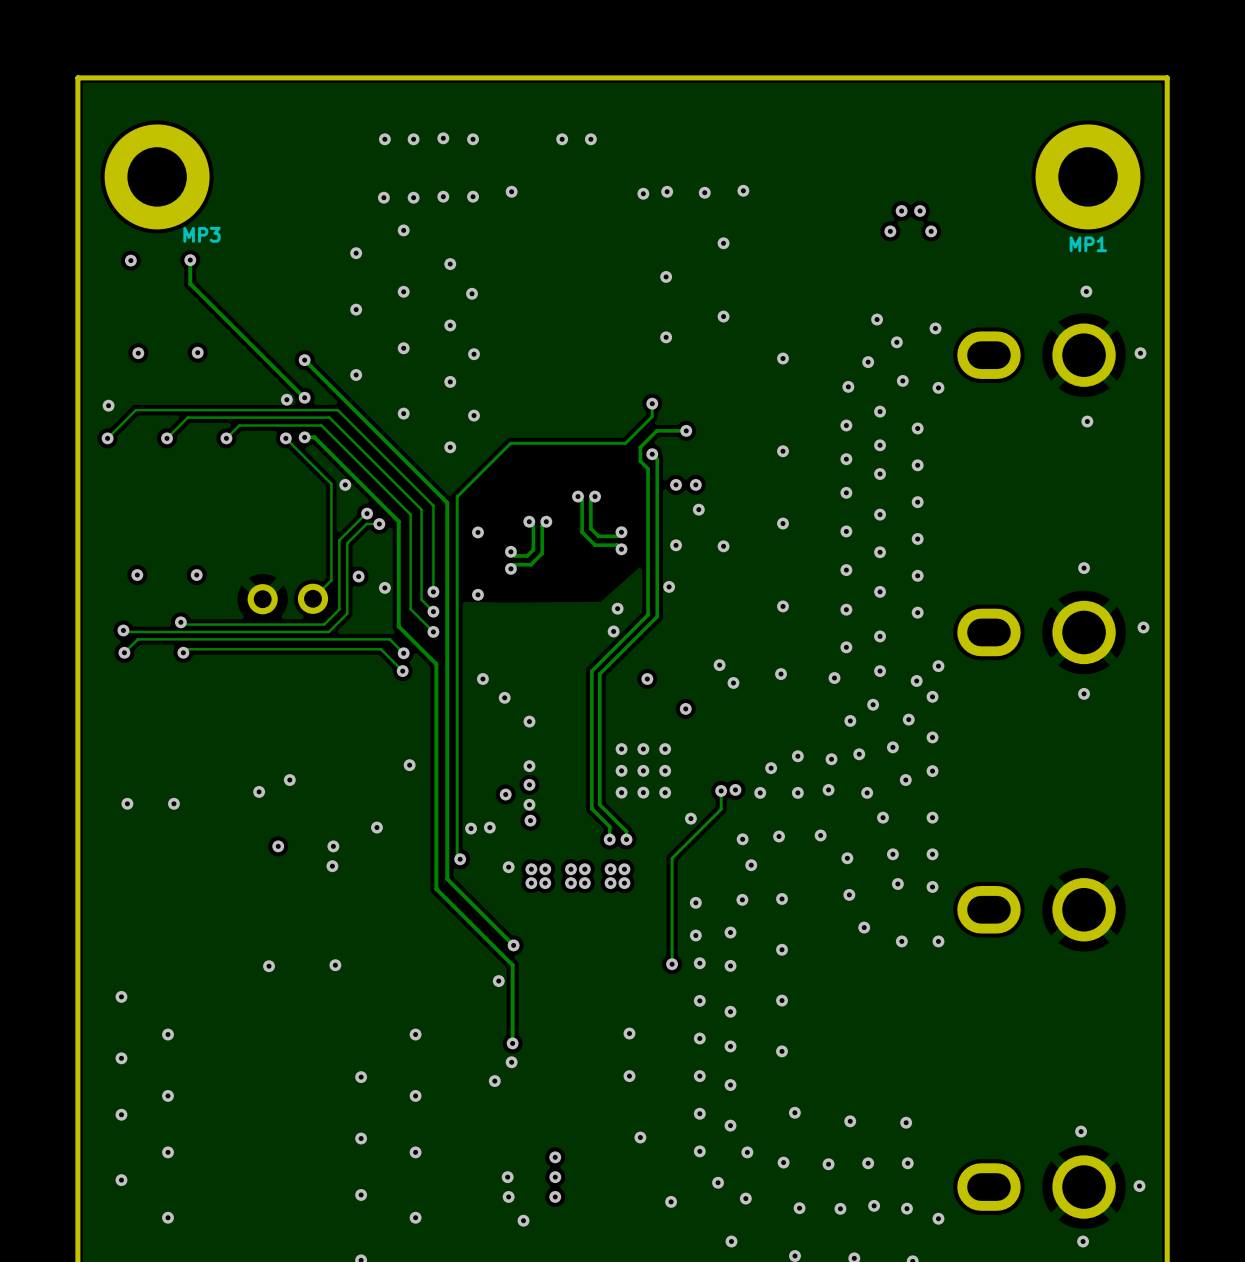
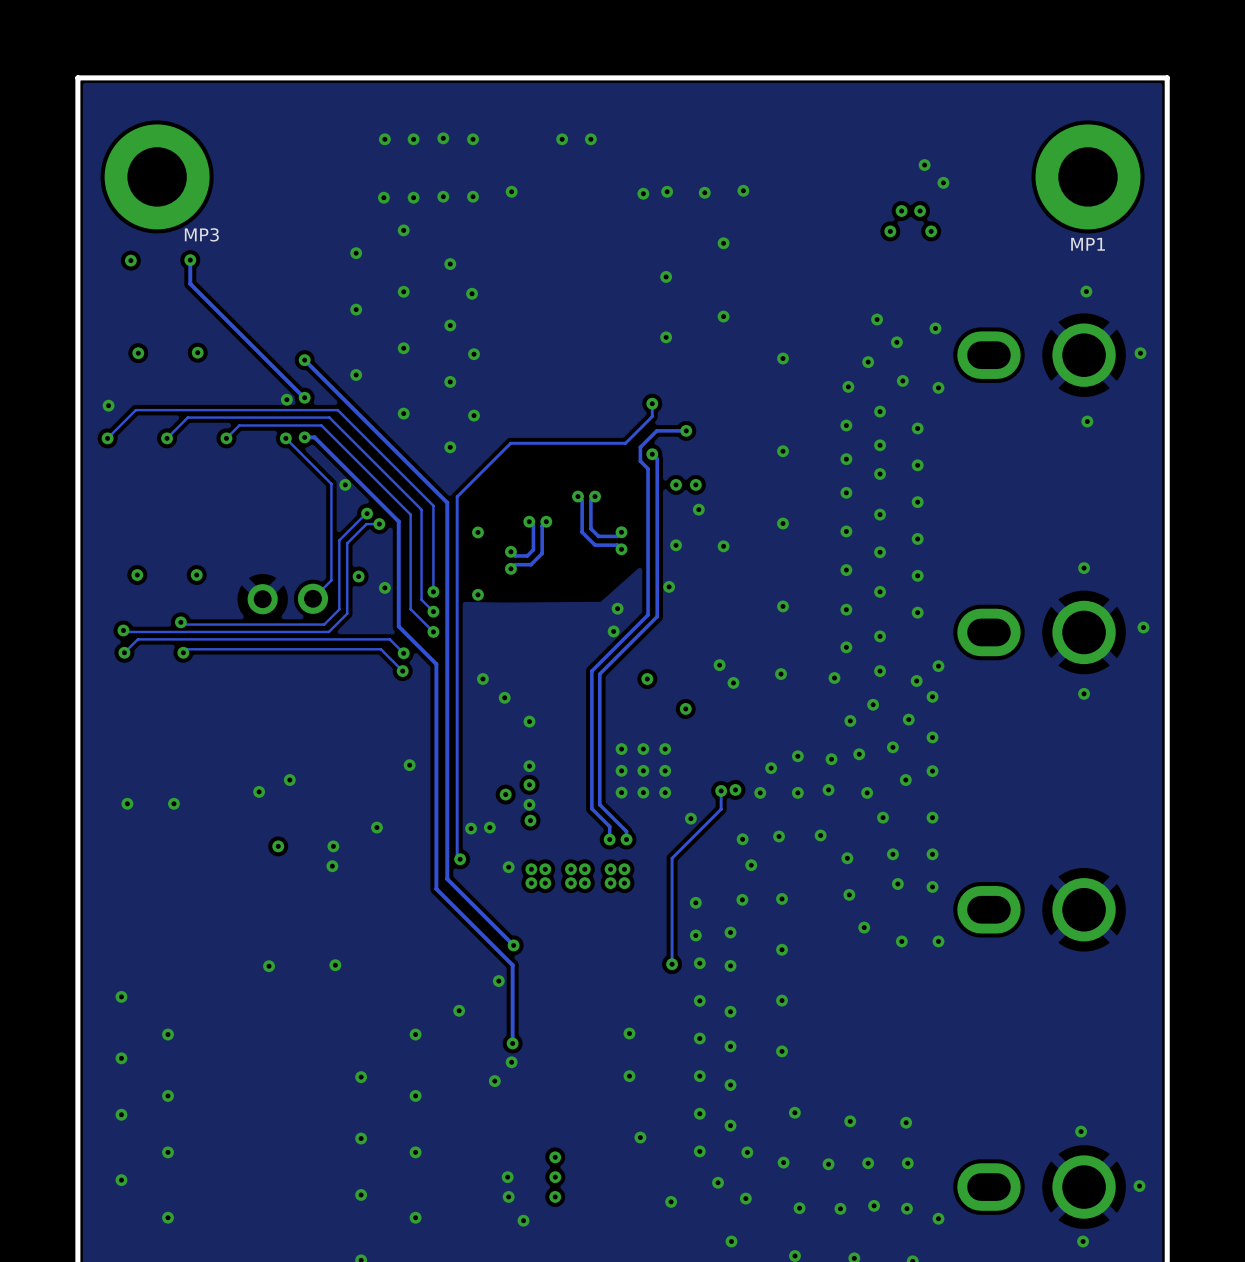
via: none -> (924, 165)
via: none -> (943, 182)
via: none -> (459, 1010)

